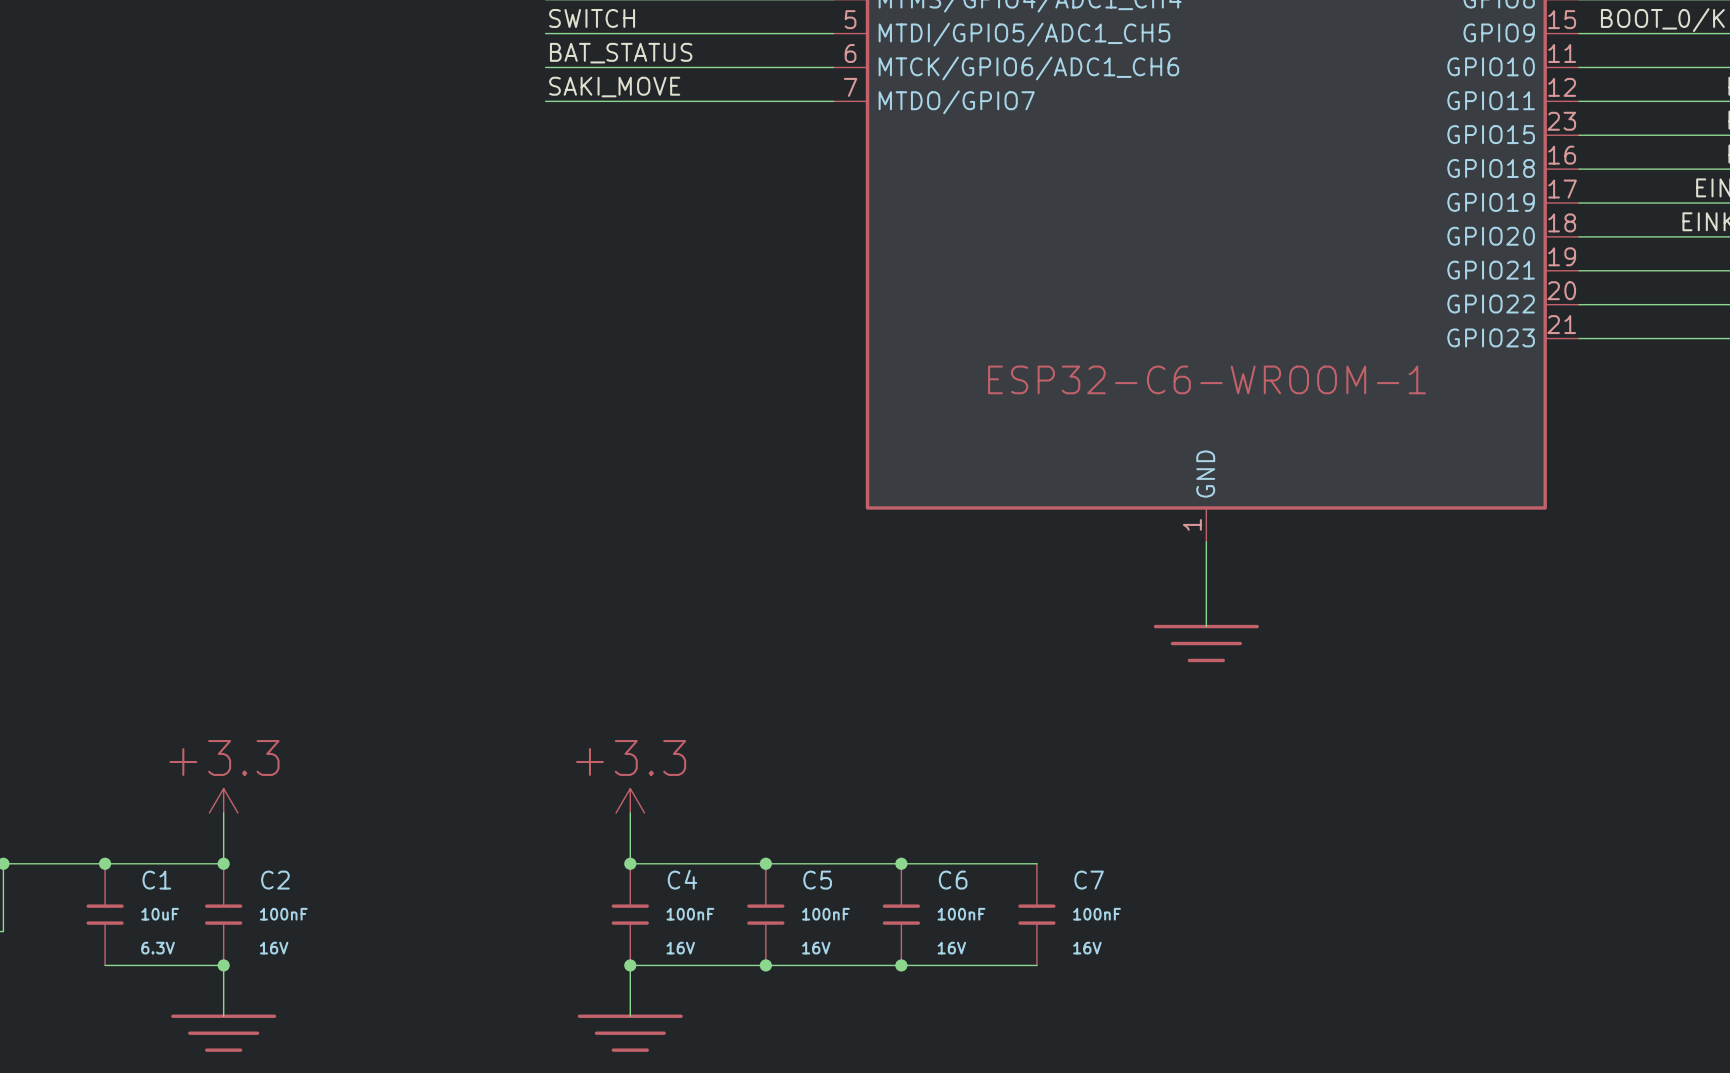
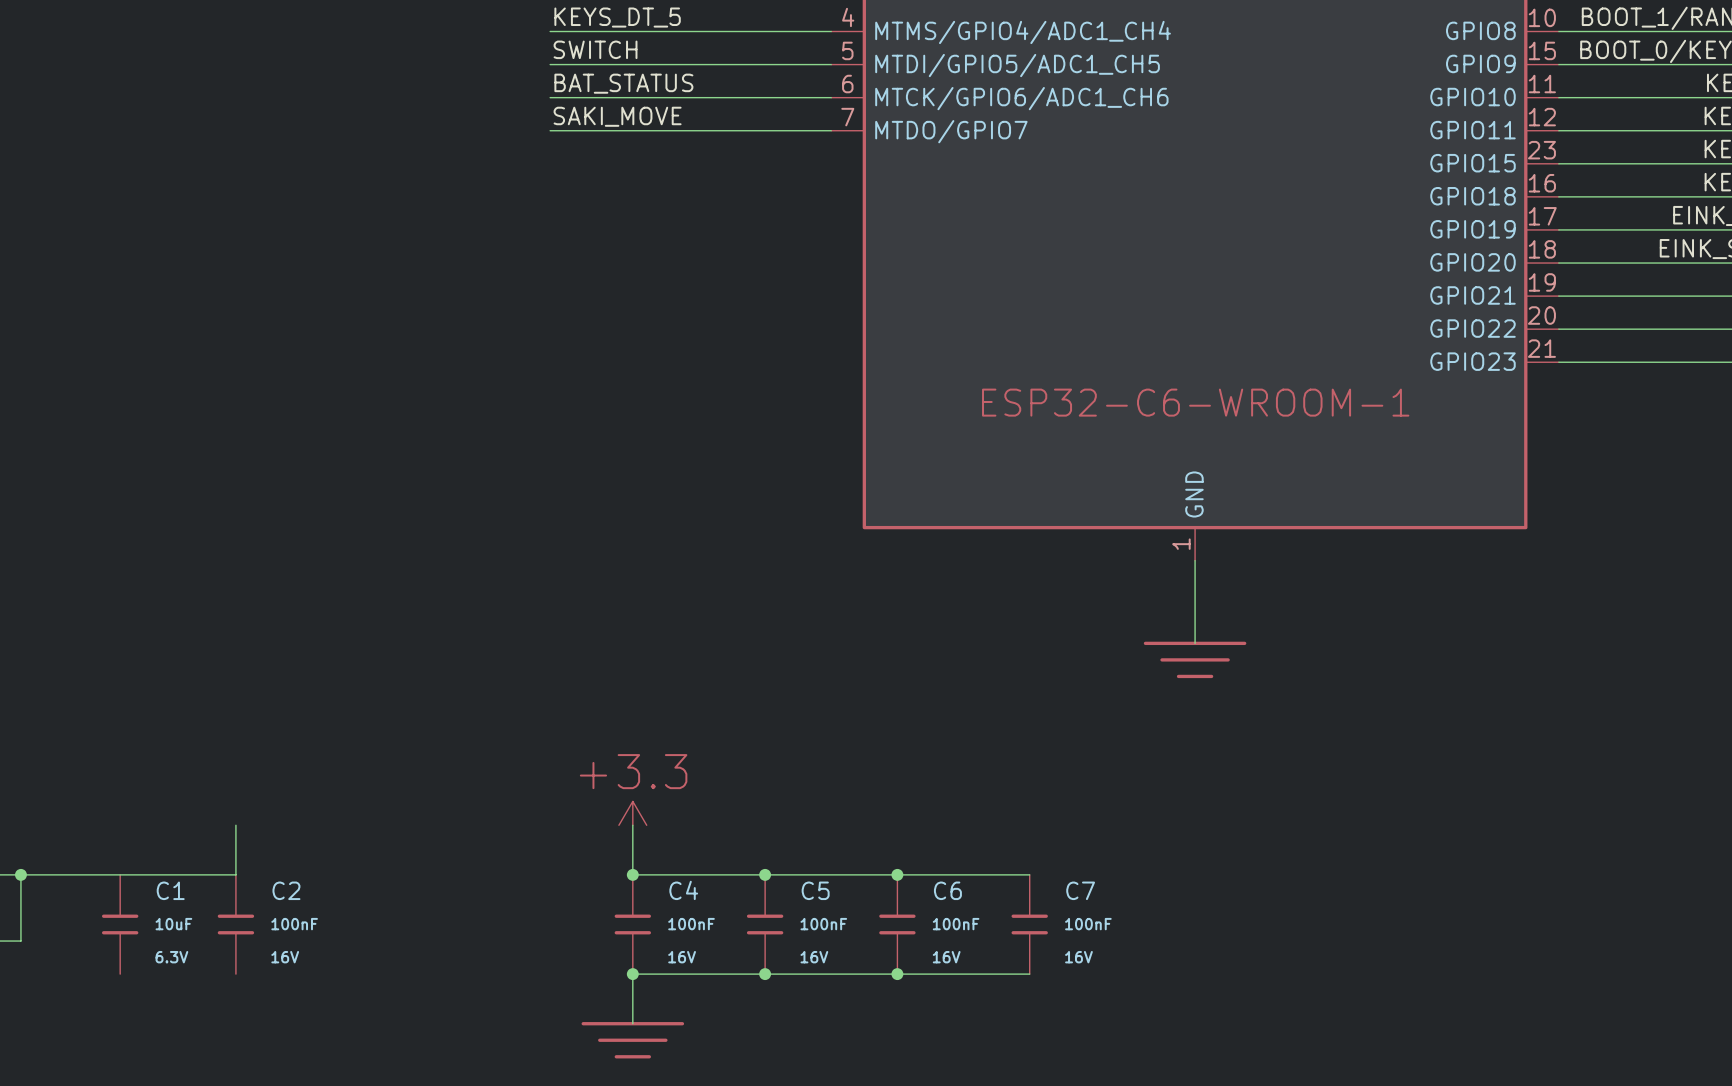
power symbol: (223, 800) -> none
junction: (105, 863) -> none
junction: (223, 863) -> none
wire: (105, 965) (223, 965) (223, 1016) -> none
junction: (223, 965) -> none
power symbol: (223, 1033) -> none

